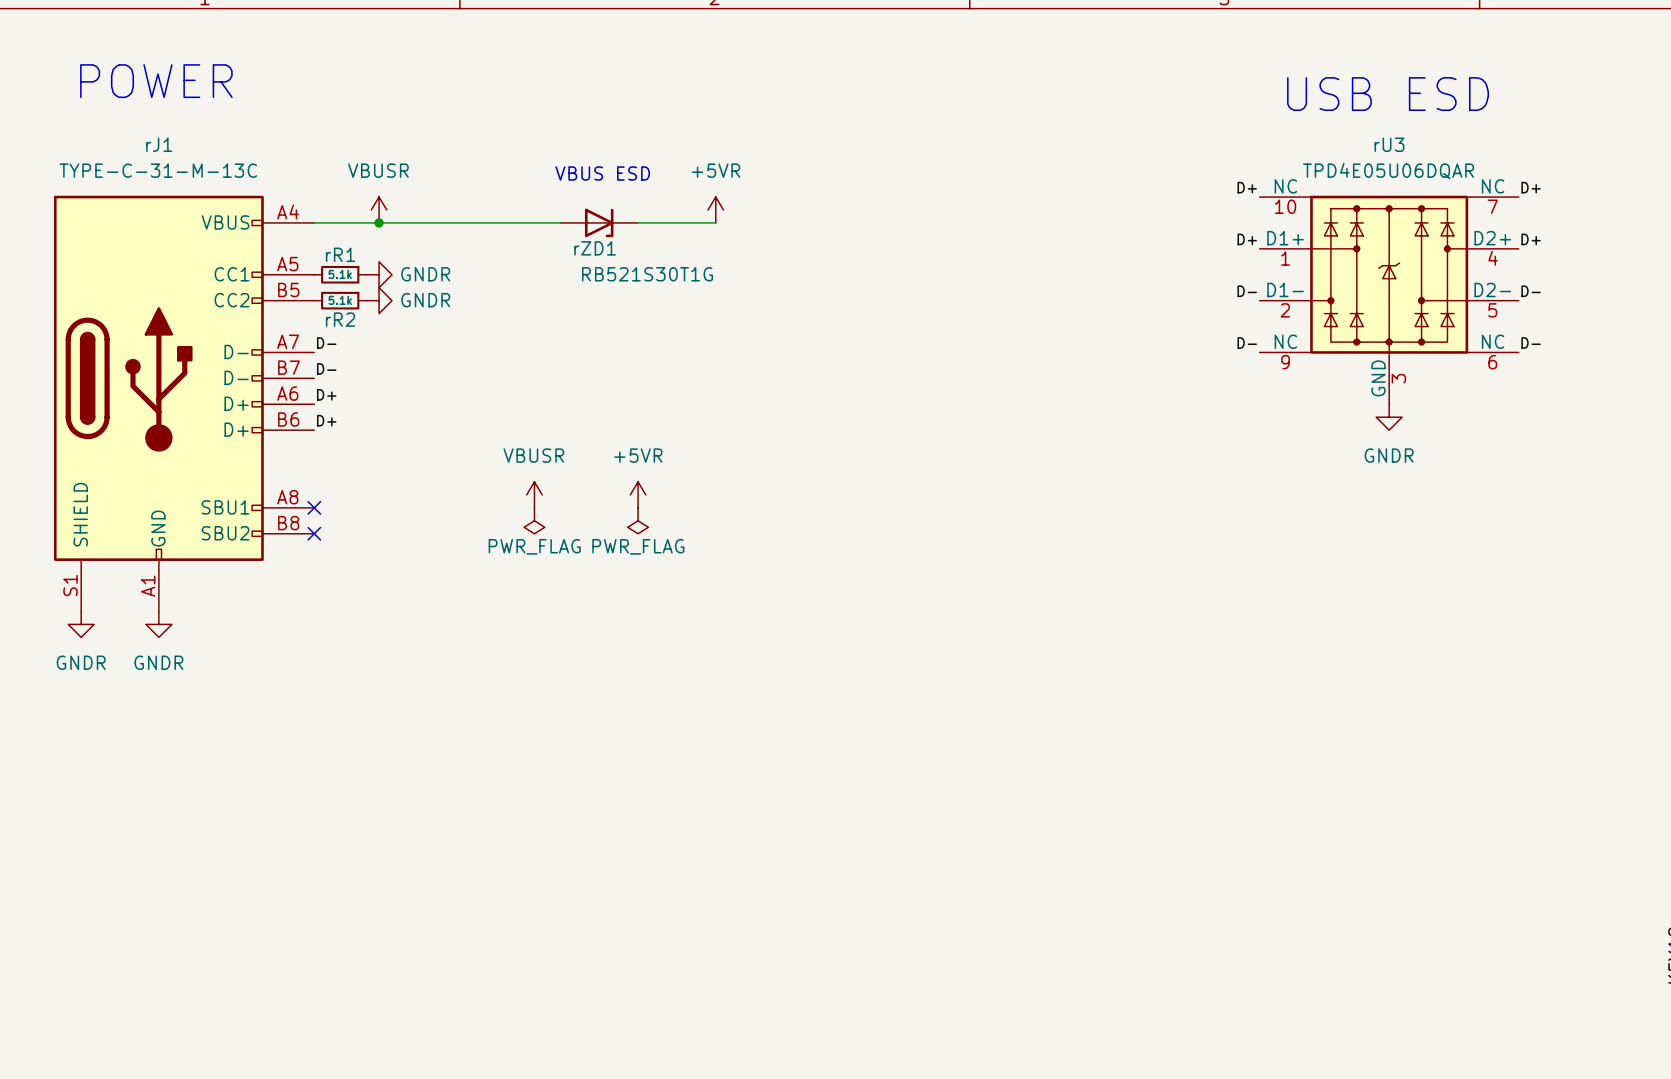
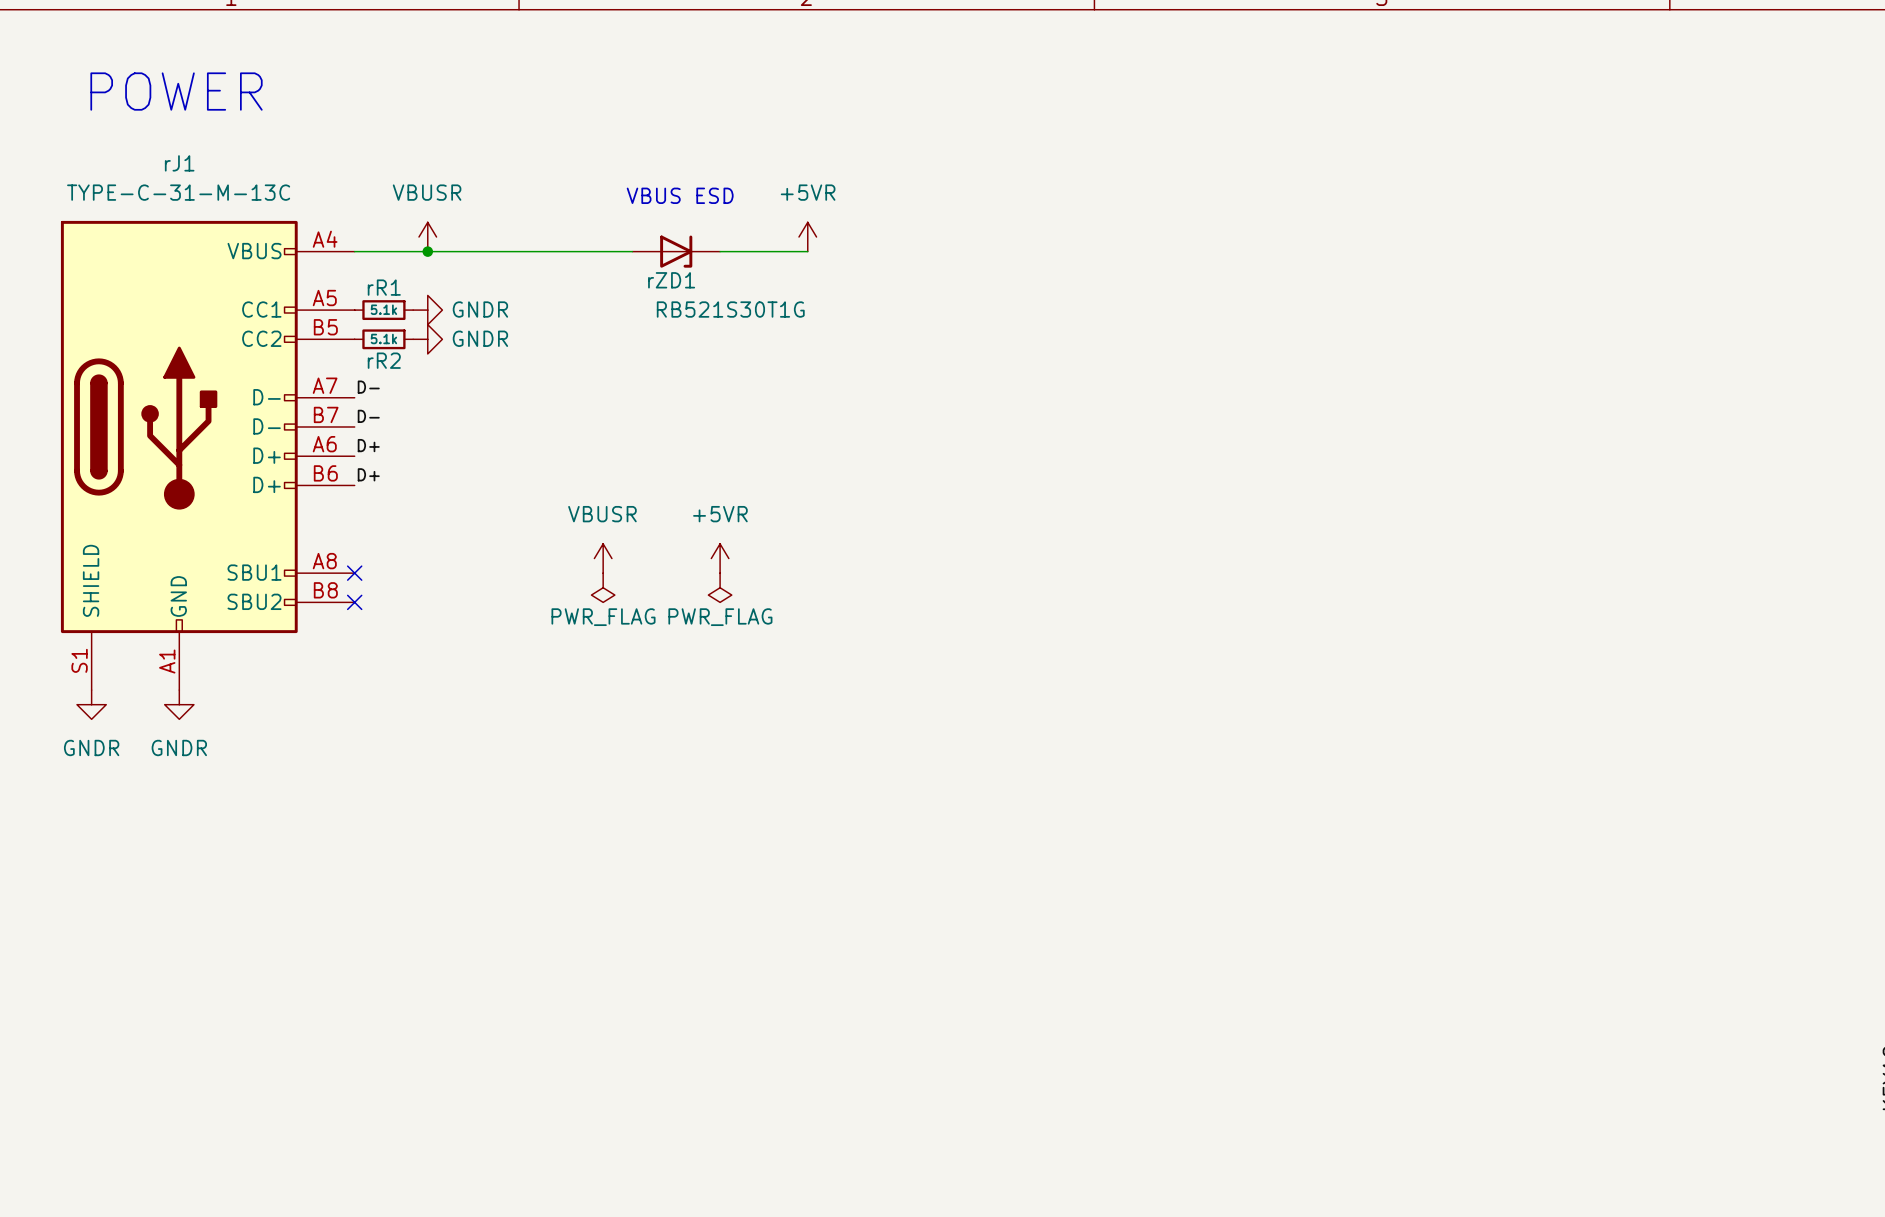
text: USB ESD (1388, 94) -> none
label: D+ (1247, 187) -> none
label: D+ (1531, 187) -> none
label: D+ (1247, 239) -> none
label: D+ (1531, 239) -> none
label: D- (1247, 291) -> none
label: D- (1531, 291) -> none
rU3: TPD4E05U06DQAR (1389, 300) -> none
label: D- (1247, 343) -> none
label: D- (1531, 343) -> none
power symbol: GNDR (1389, 417) -> none

